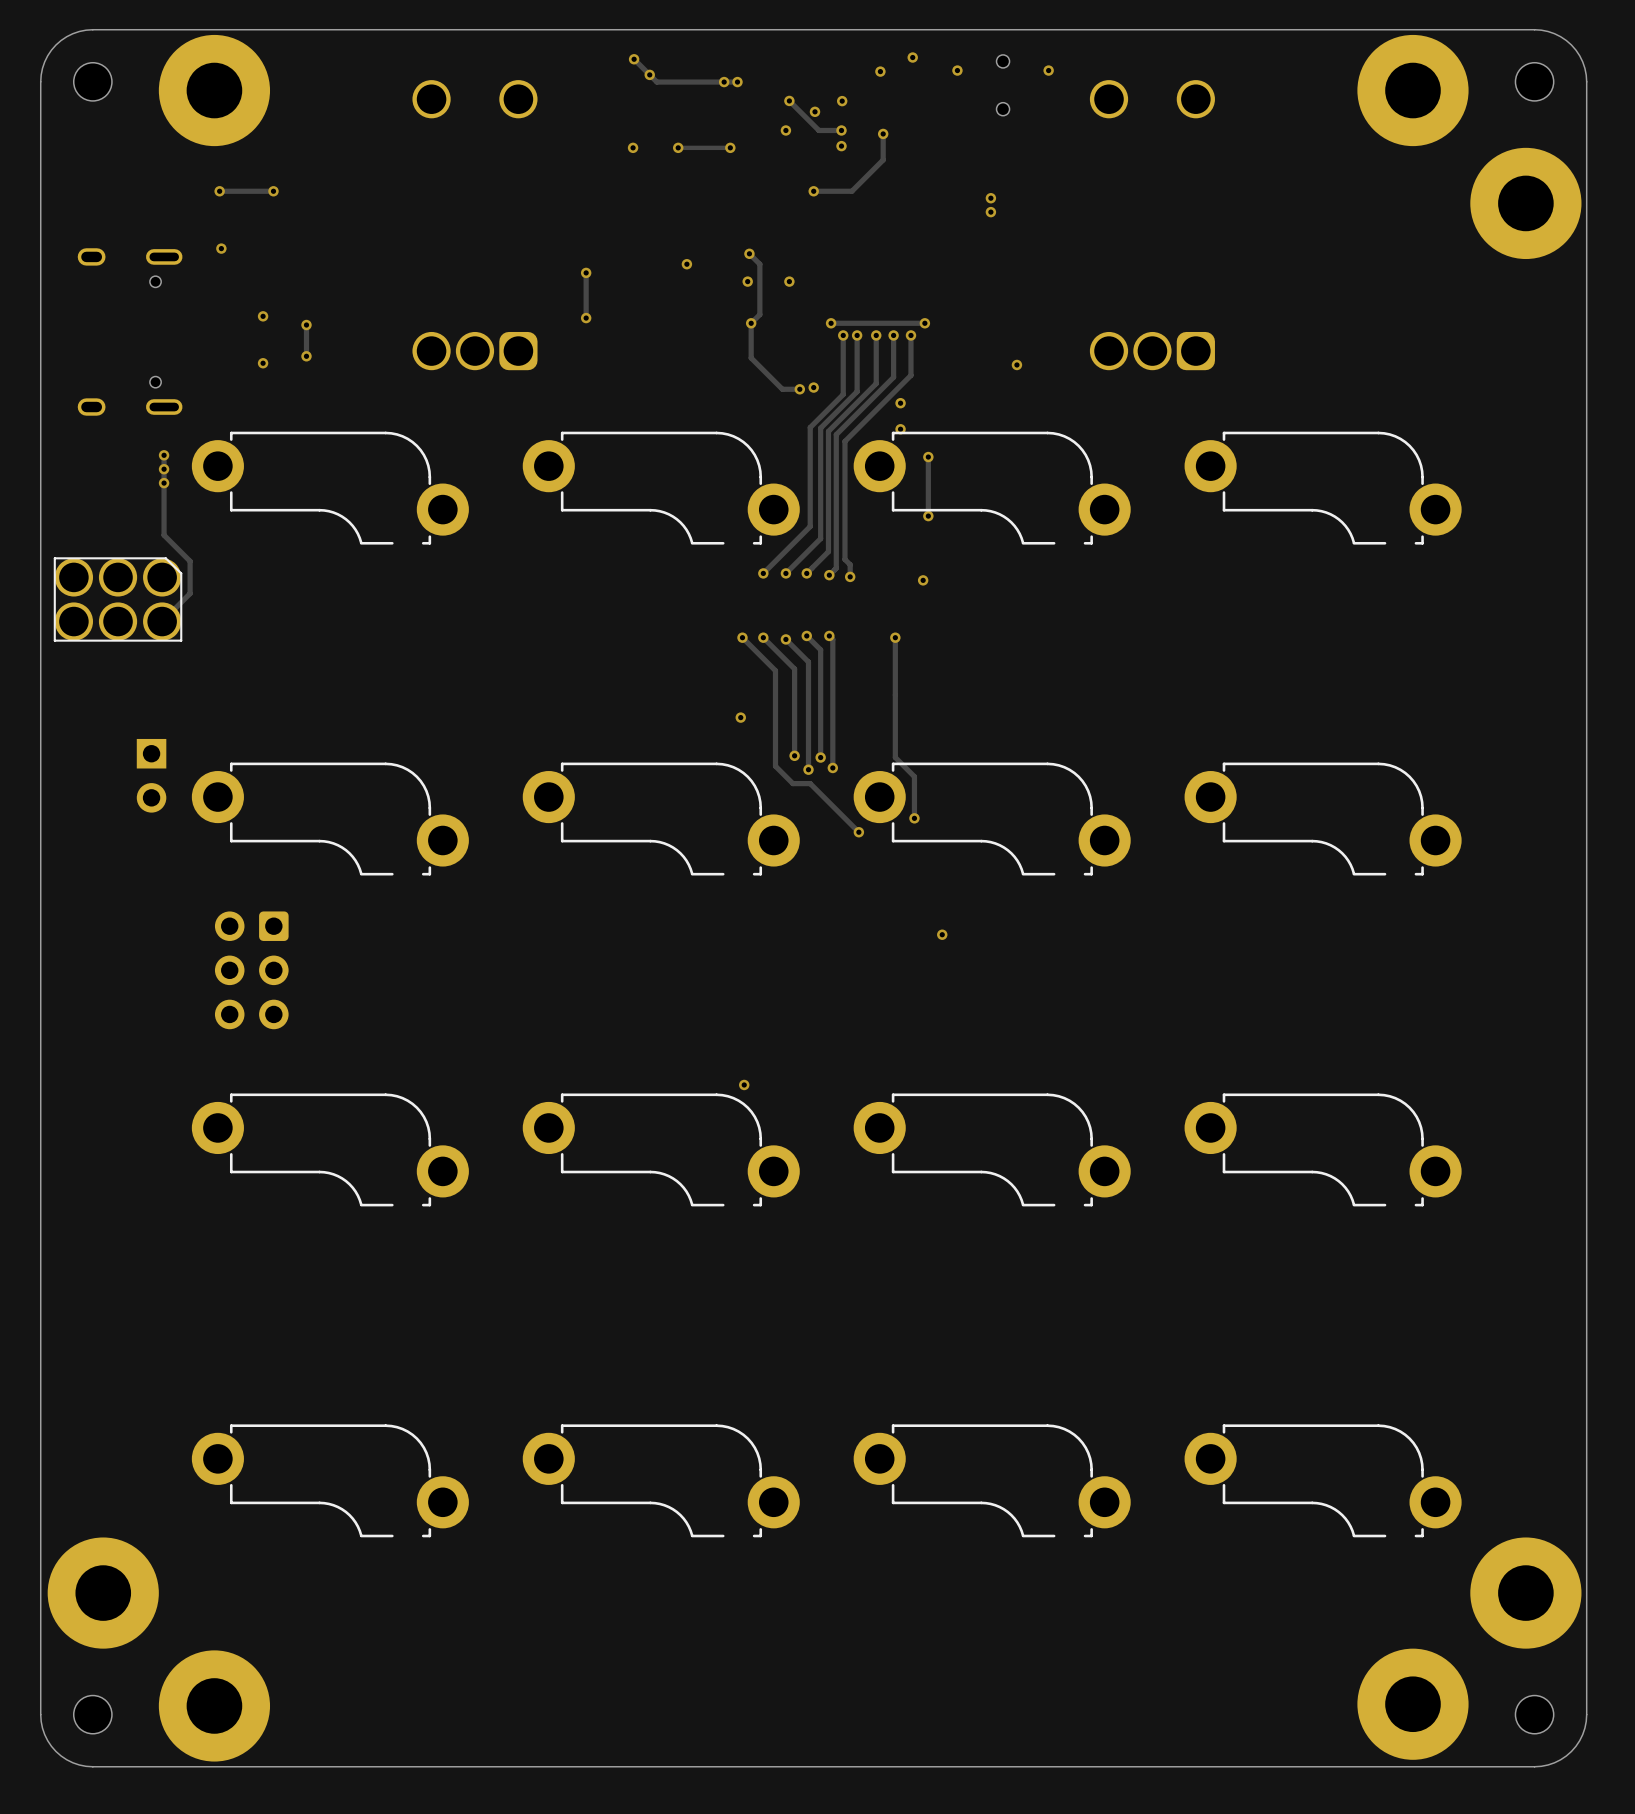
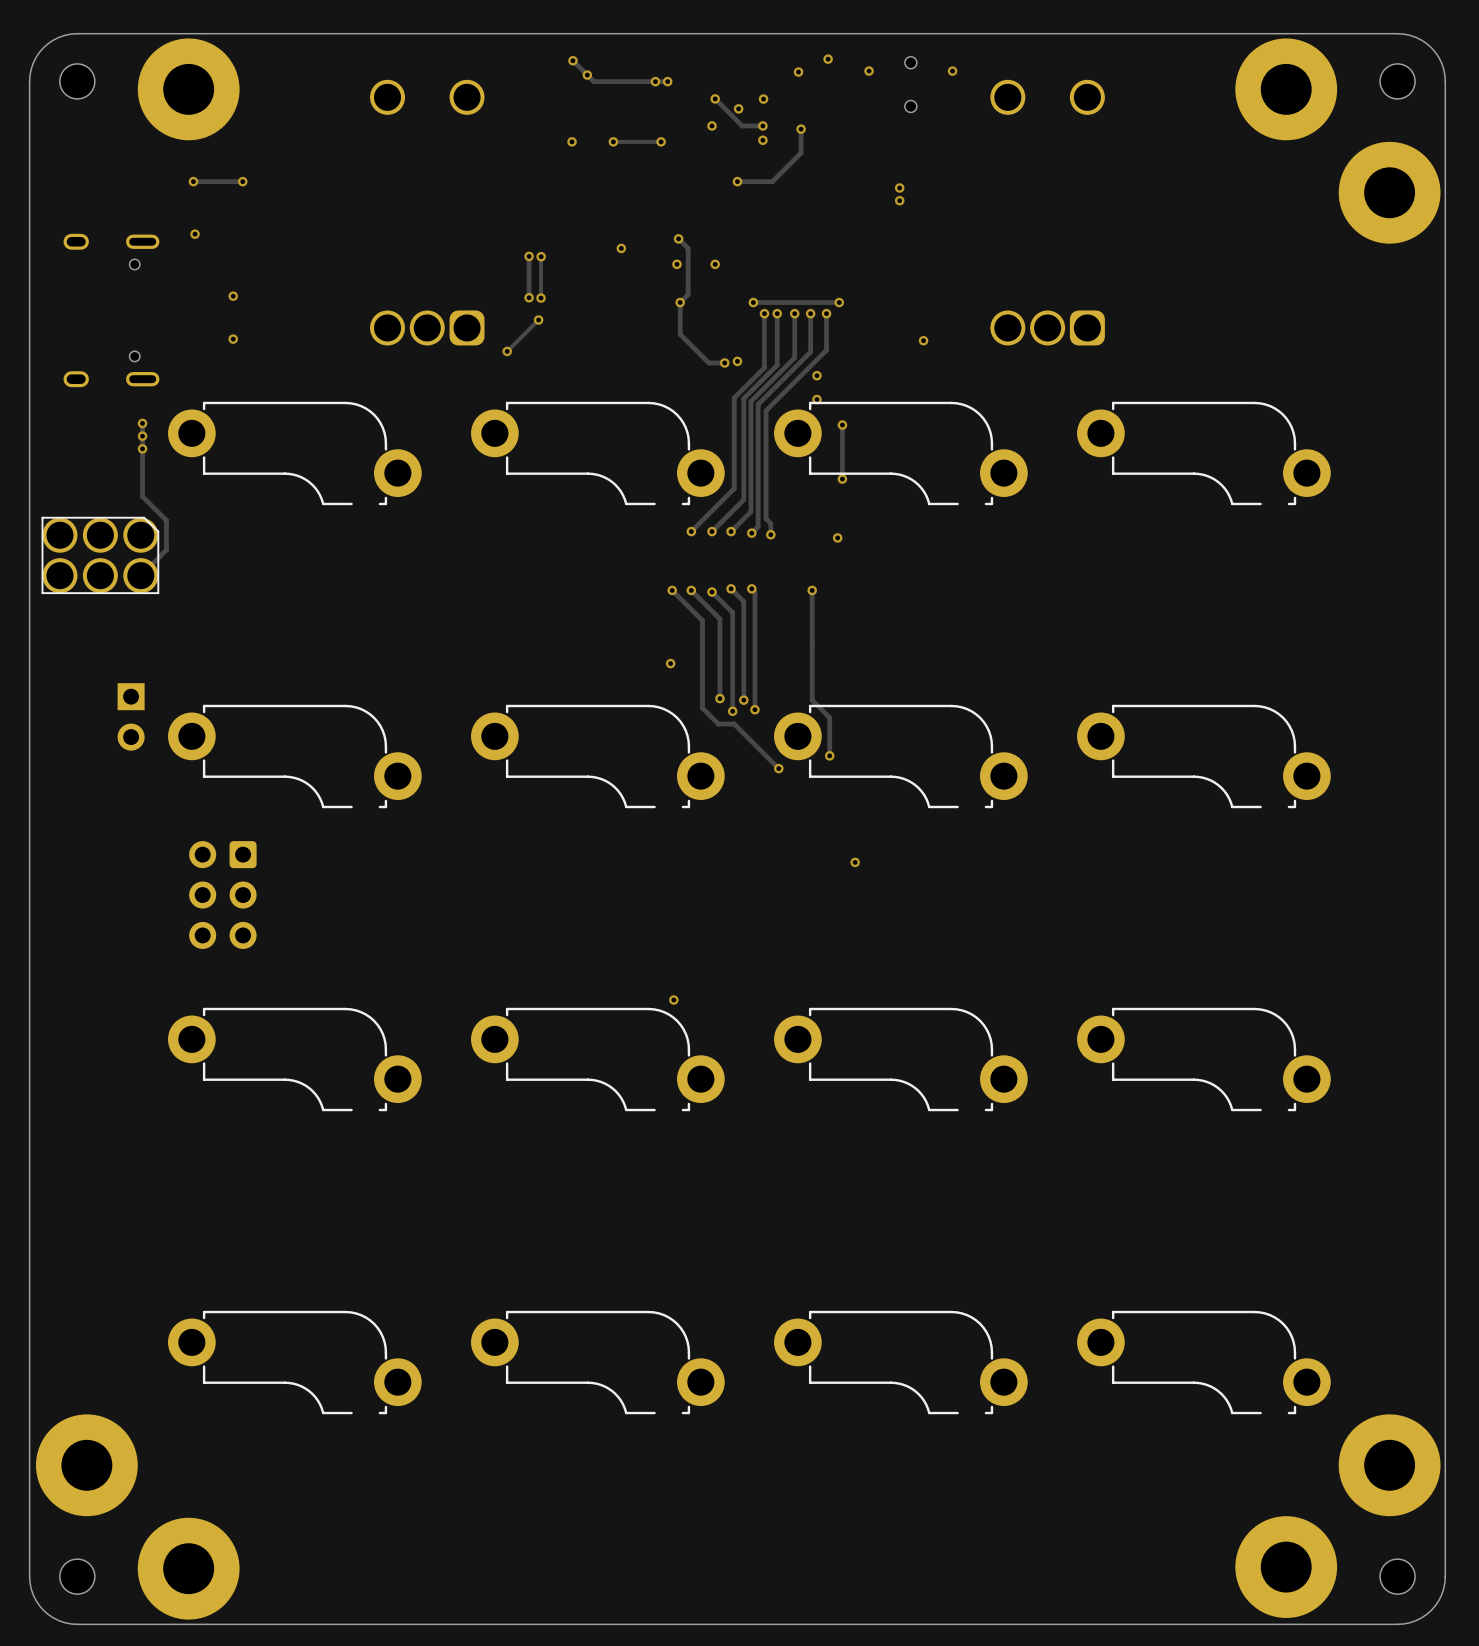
track: none -> (541, 256) (541, 298)
via: none -> (541, 256)
via: none -> (541, 298)
track: (306, 325) (306, 356) -> none
via: (306, 325) -> none
track: none -> (538, 320) (507, 351)
via: none -> (538, 320)
via: (306, 356) -> none
via: none -> (507, 351)

